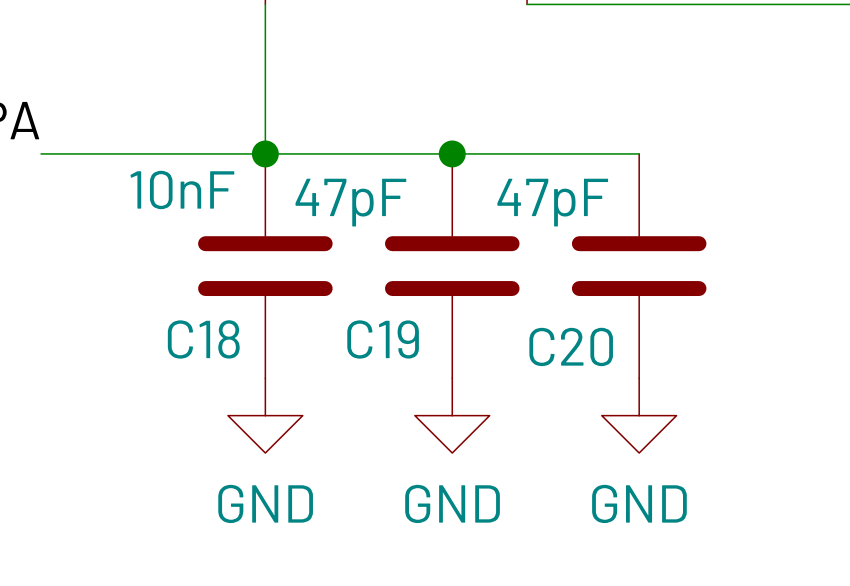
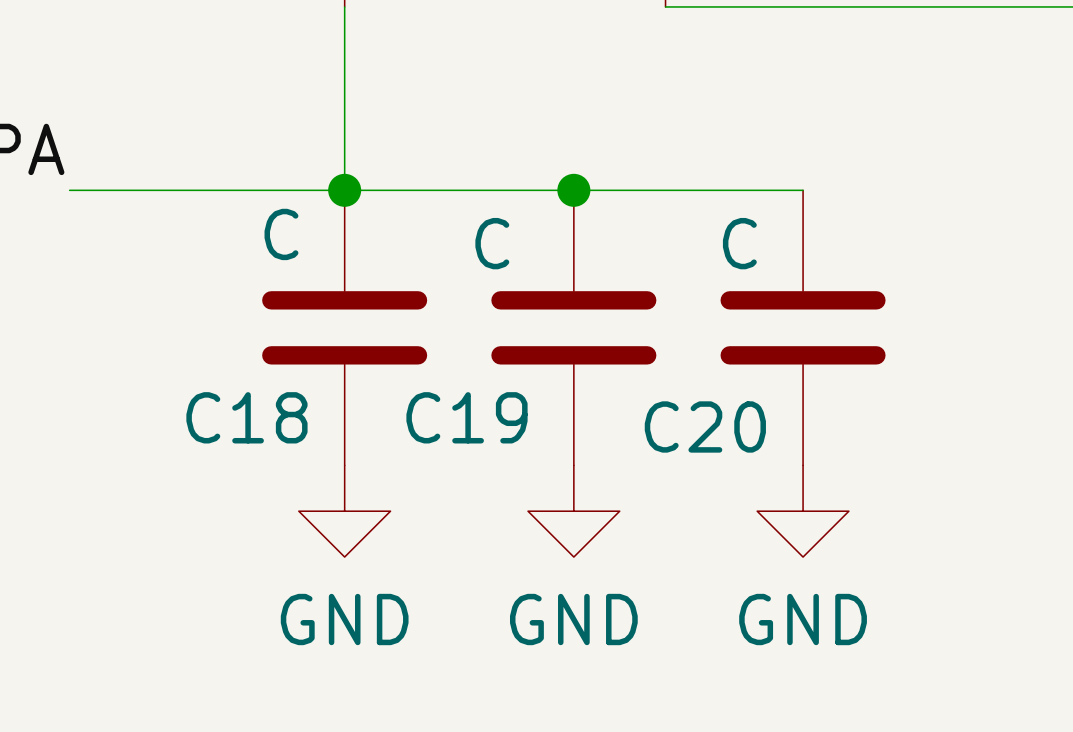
C18 value: 10nF (182, 189) -> C (281, 234)
C19 value: 47pF (350, 202) -> C (492, 243)
C20 value: 47pF (552, 202) -> C (739, 243)

